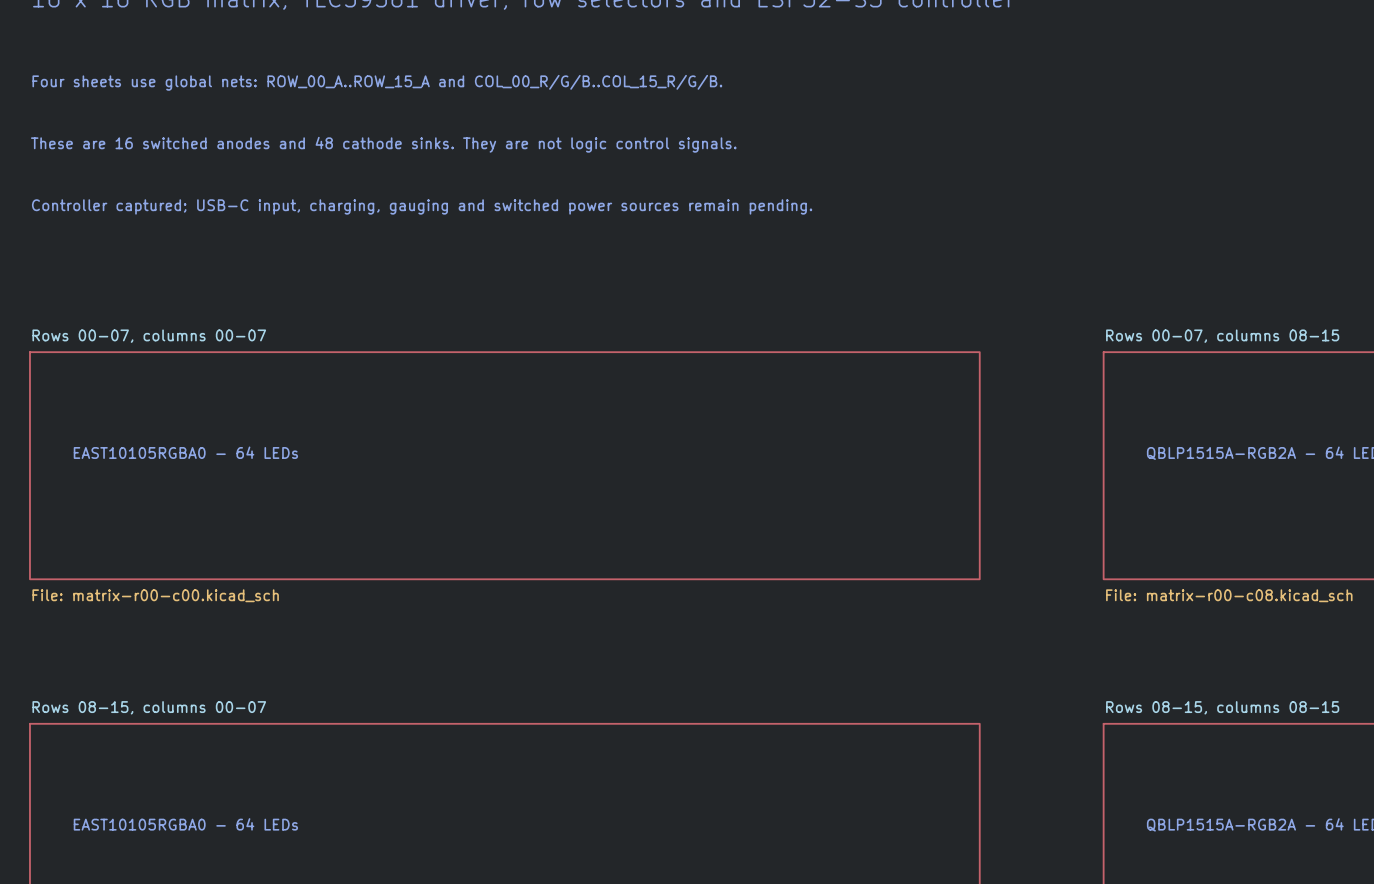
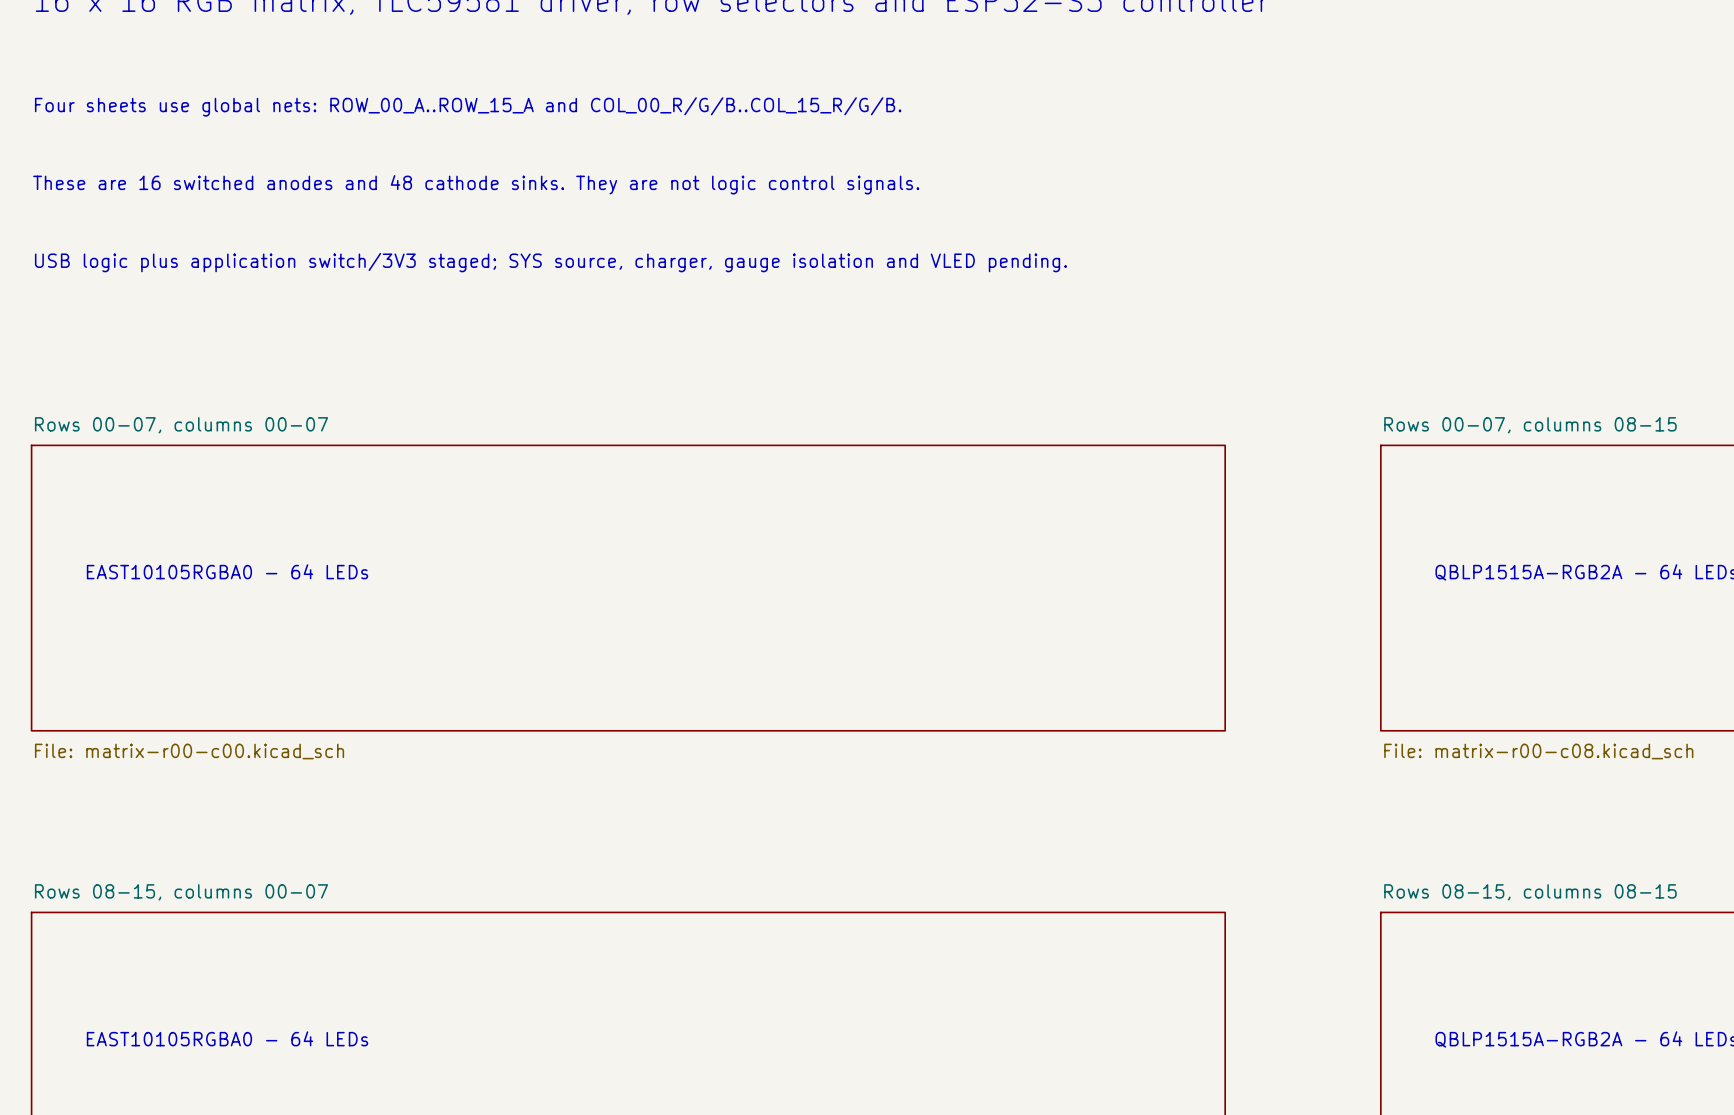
text: Controller captured; USB-C input, charging, gauging and switched power sources remain pending. (422, 206) -> USB logic plus application switch/3V3 staged; SYS source, charger, gauge isolation and VLED pending. (550, 262)

